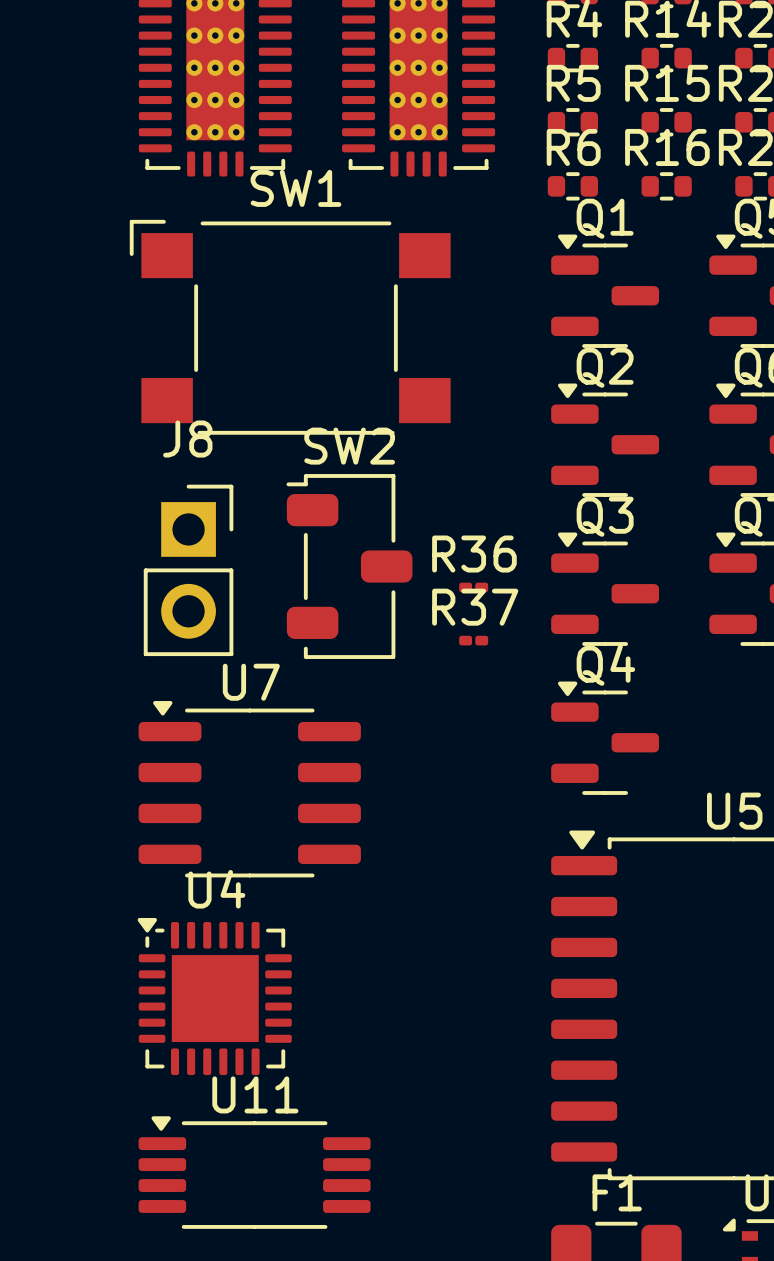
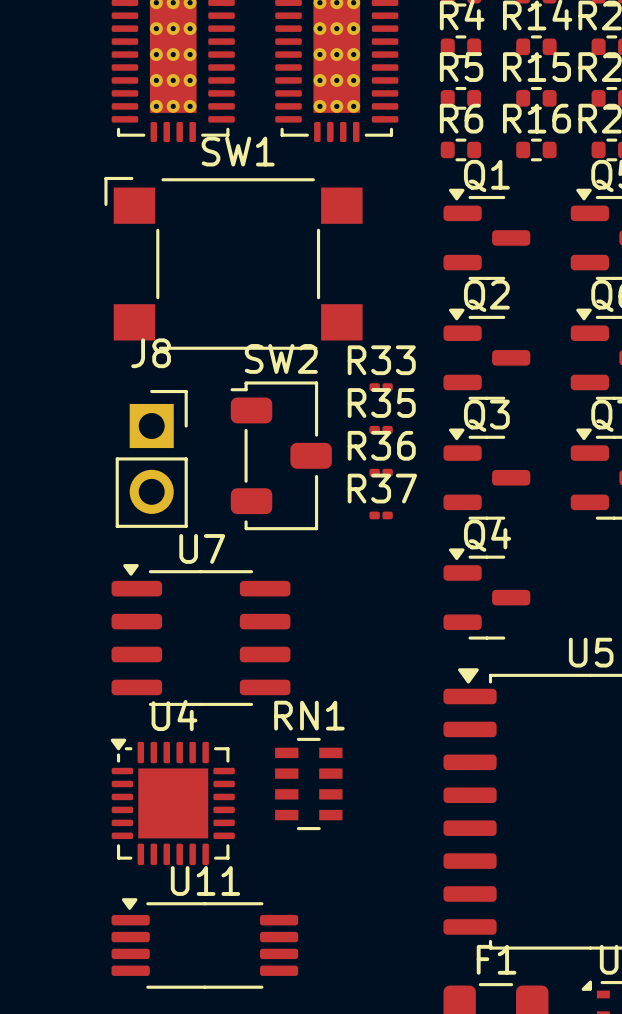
R33: none -> (381, 387)
R35: none -> (381, 429)
RN1: none -> (308, 783)

